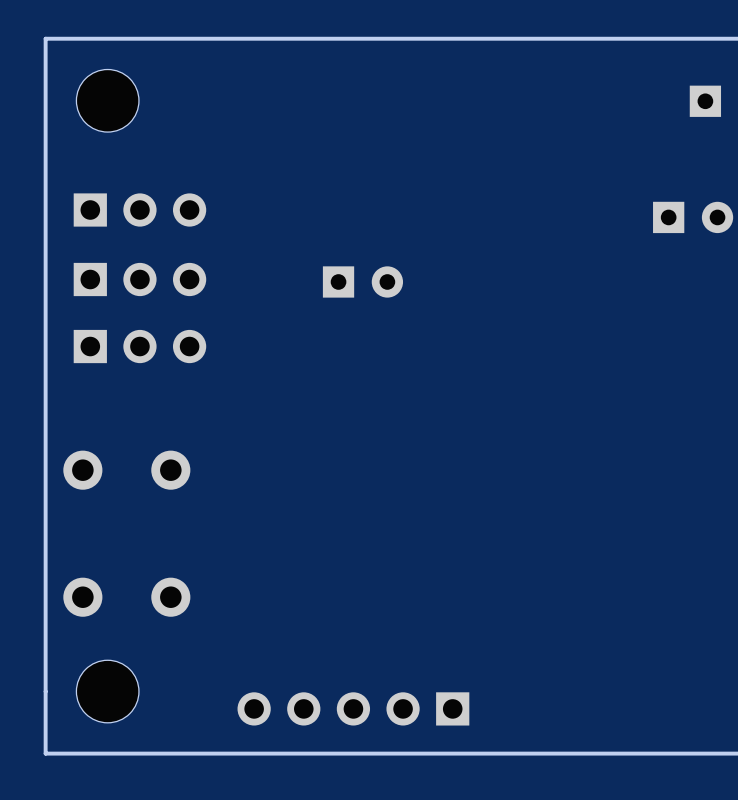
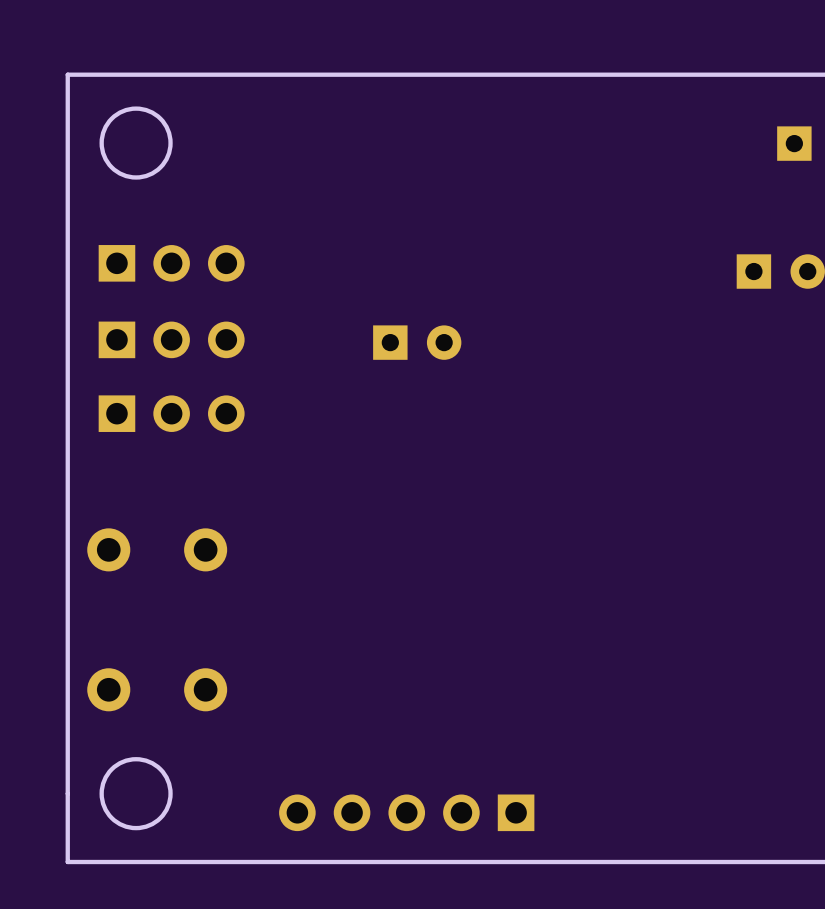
round board edge: none -> [99, 106, 173, 180]
part: (107, 100) -> none
round board edge: none -> [99, 757, 173, 831]
part: (107, 691) -> none

